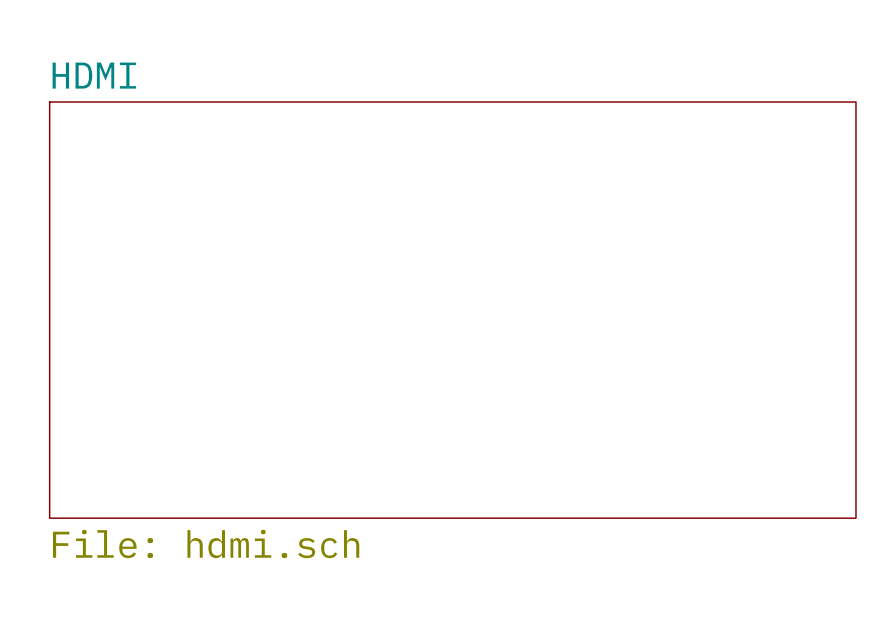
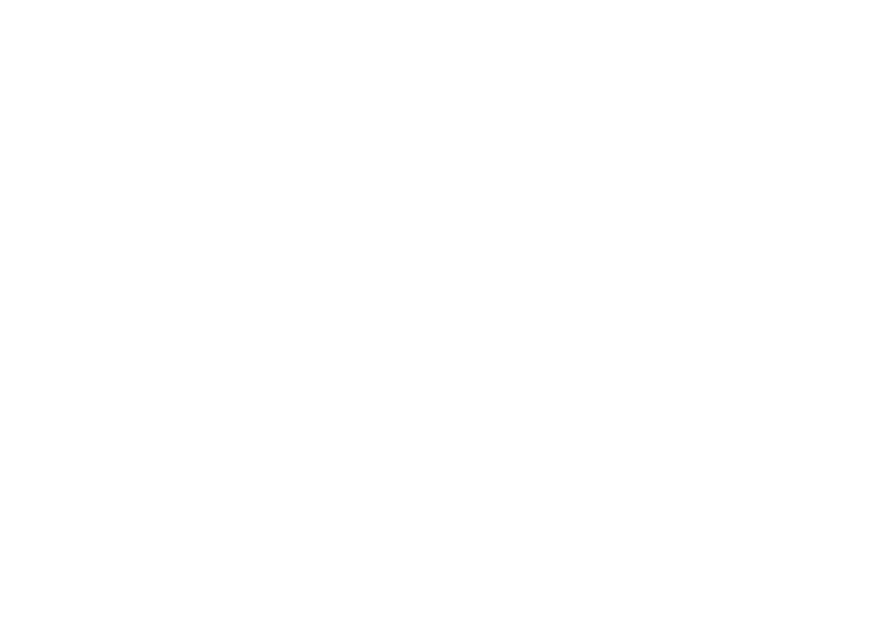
sheet HDMI: File: hdmi.sch (452, 310) -> none

